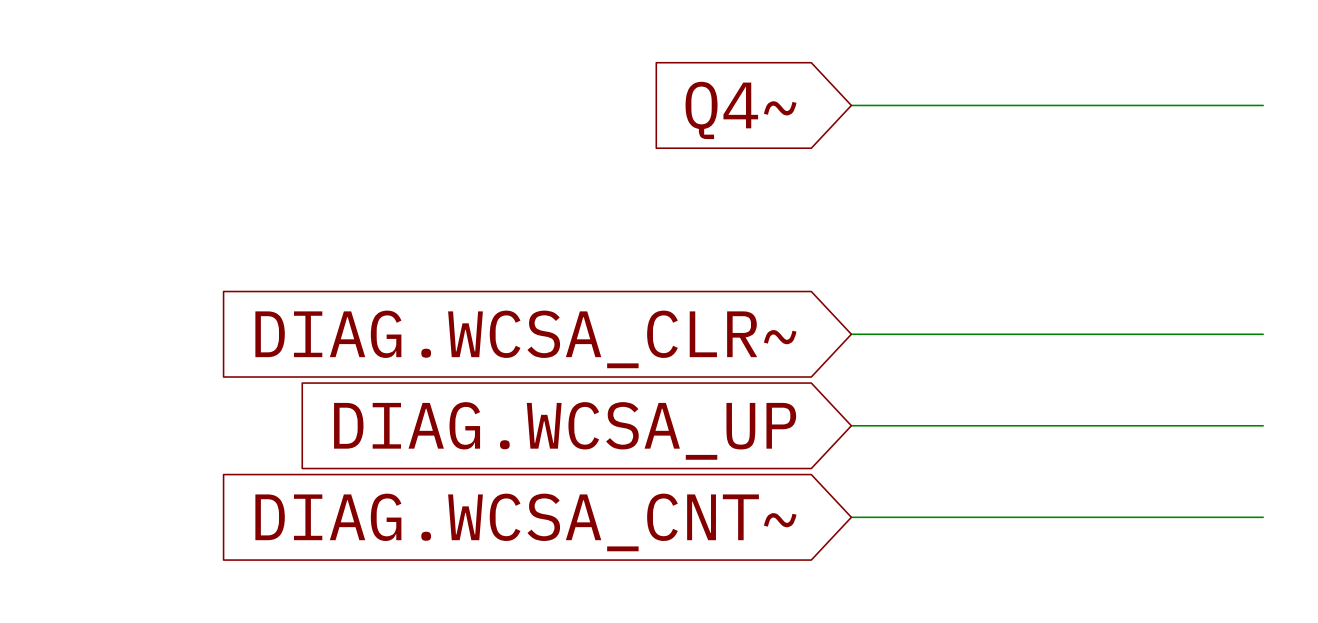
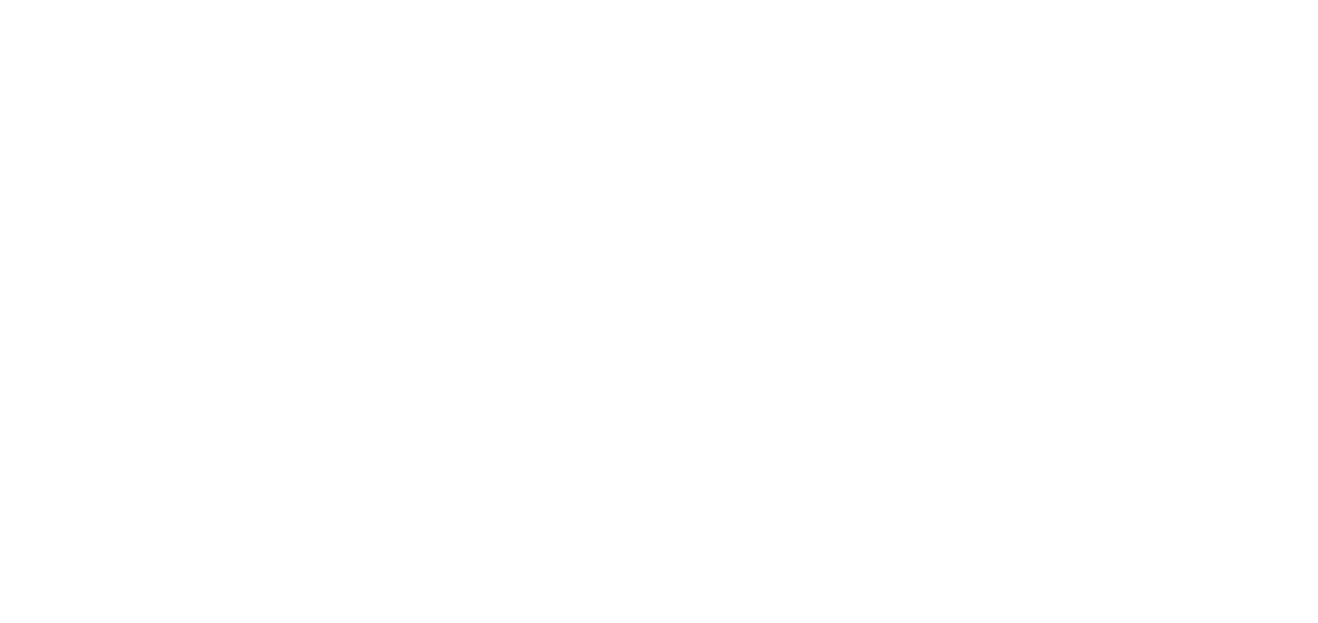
wire: (851, 105) (1263, 105) -> none
global label: Q4~ (741, 110) -> none
wire: (851, 334) (1263, 334) -> none
global label: DIAG.WCSA_CLR~ (525, 339) -> none
wire: (851, 425) (1263, 425) -> none
global label: DIAG.WCSA_UP (565, 430) -> none
wire: (851, 517) (1263, 517) -> none
global label: DIAG.WCSA_CNT~ (525, 522) -> none

